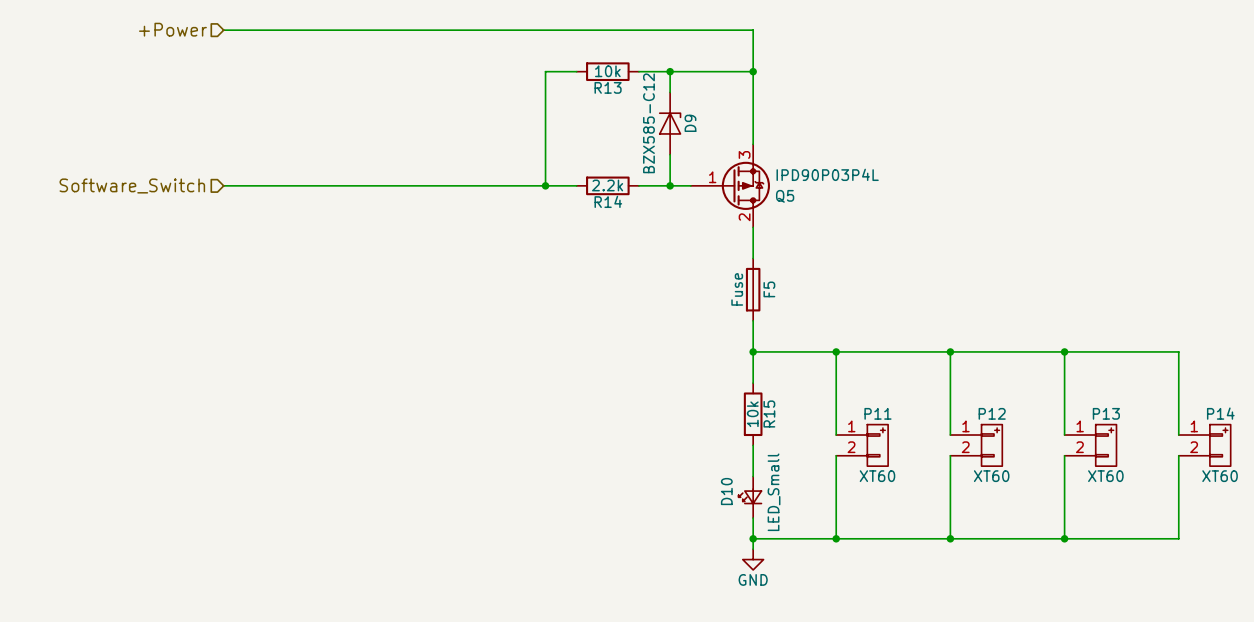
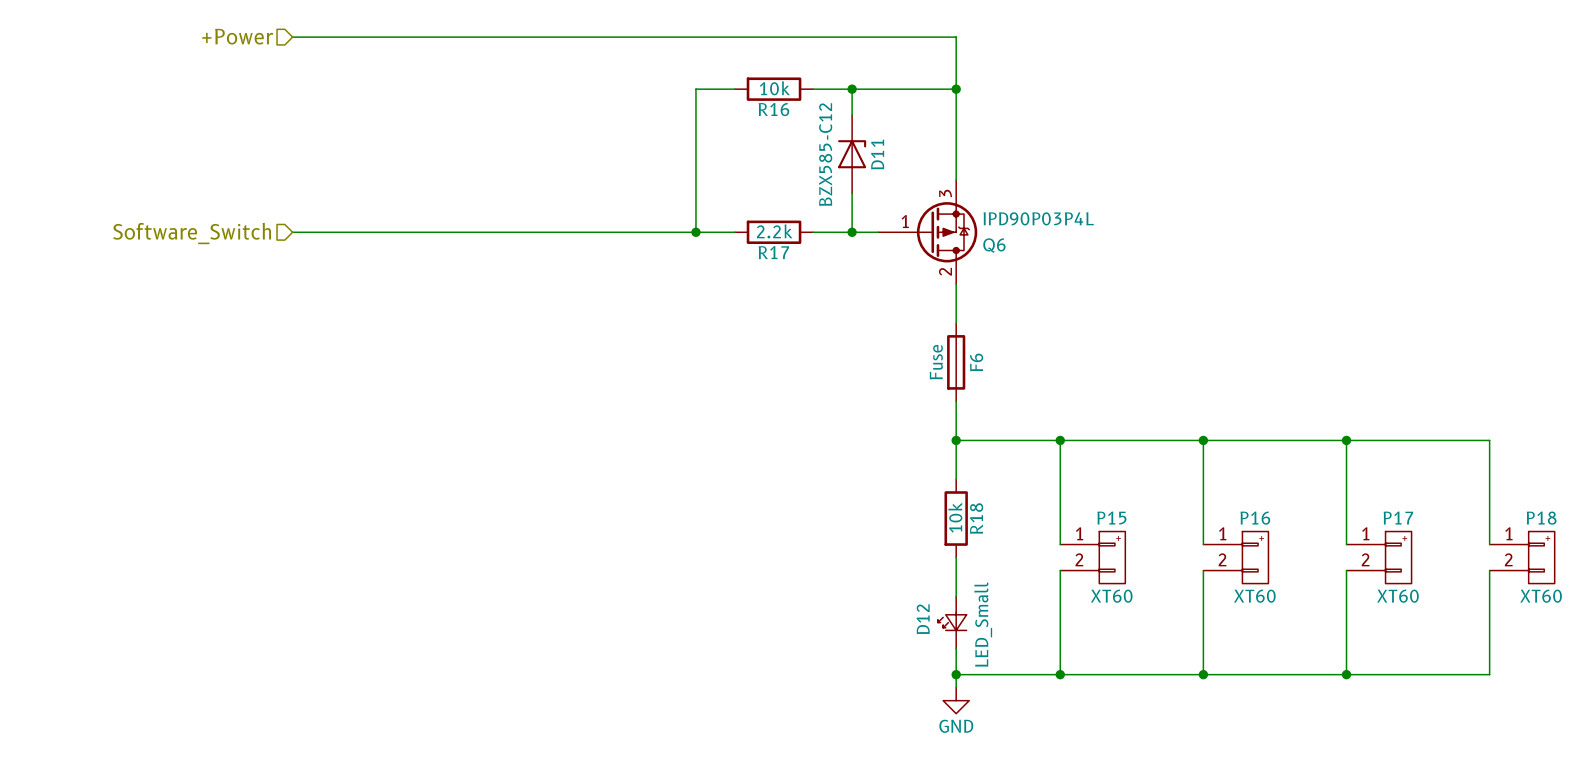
R13 name: R13 (608, 87) -> R16 (773, 109)
D9 name: D9 (690, 123) -> D11 (877, 154)
Q5 name: Q5 (785, 196) -> Q6 (994, 245)
R14 name: R14 (608, 201) -> R17 (773, 252)
F5 name: F5 (769, 289) -> F6 (976, 362)
R15 name: R15 (769, 413) -> R18 (976, 518)
P11 name: P11 (877, 413) -> P15 (1111, 518)
P12 name: P12 (992, 413) -> P16 (1255, 518)
P13 name: P13 (1106, 413) -> P17 (1398, 518)
P14 name: P14 (1220, 413) -> P18 (1541, 518)
D10 name: D10 (726, 491) -> D12 (923, 619)

